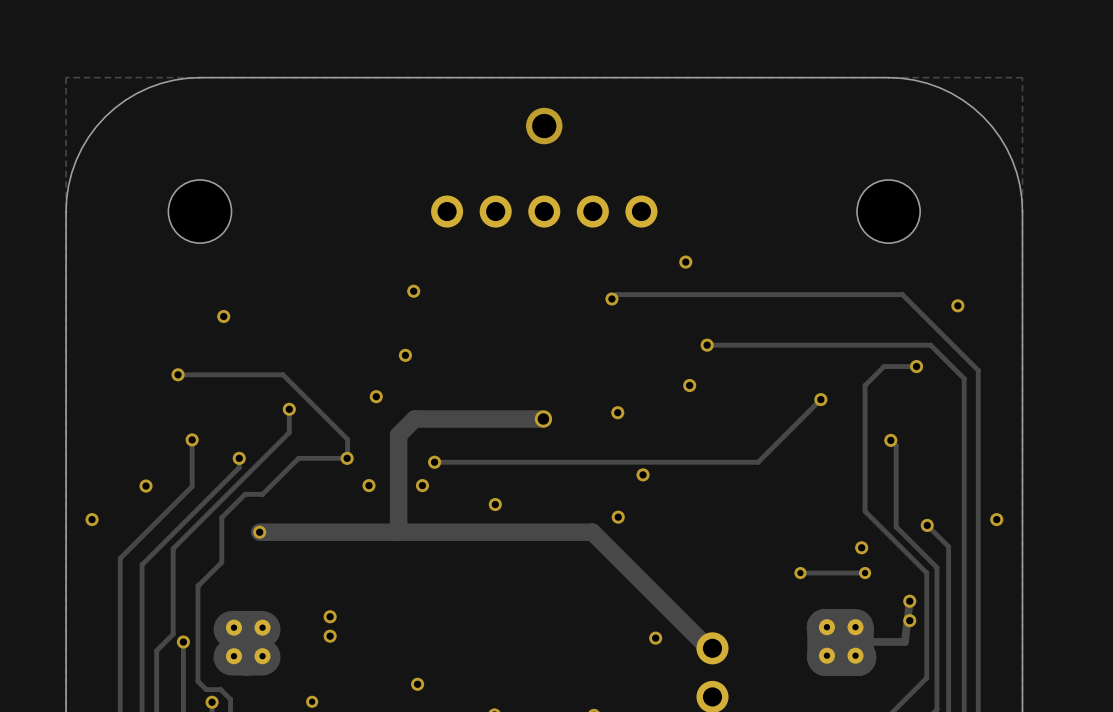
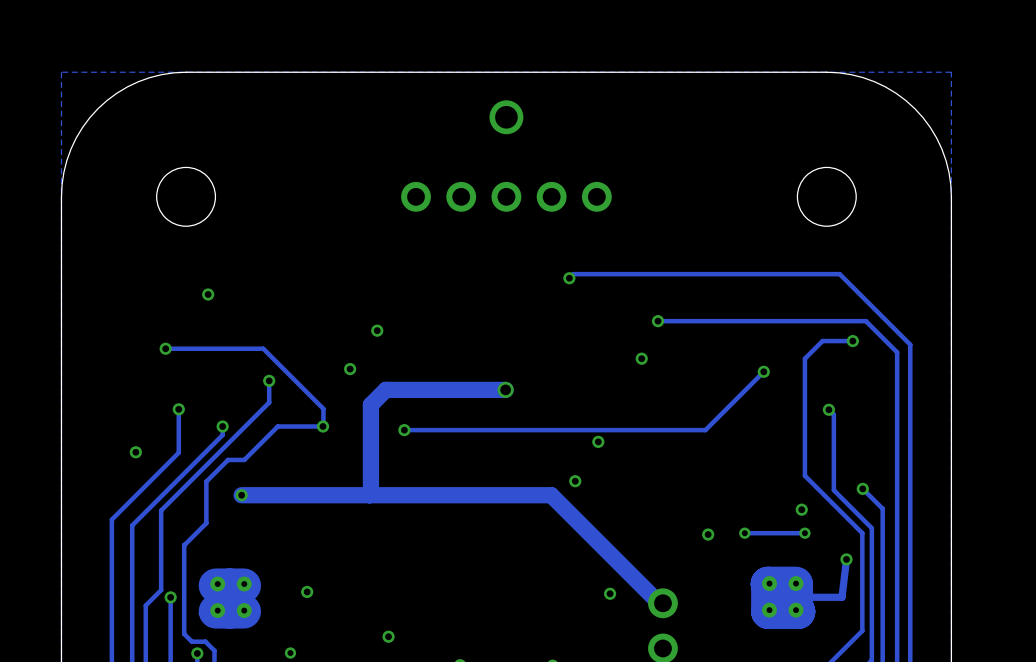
via: (685, 262) -> none
via: (413, 291) -> none
via: (957, 305) -> none
via: (617, 412) -> none
via: (369, 485) -> none
via: (422, 485) -> none
via: (495, 504) -> none
via: (92, 519) -> none
via: (996, 519) -> none
via: none -> (708, 534)
via: (330, 616) -> none
via: (909, 620) -> none

